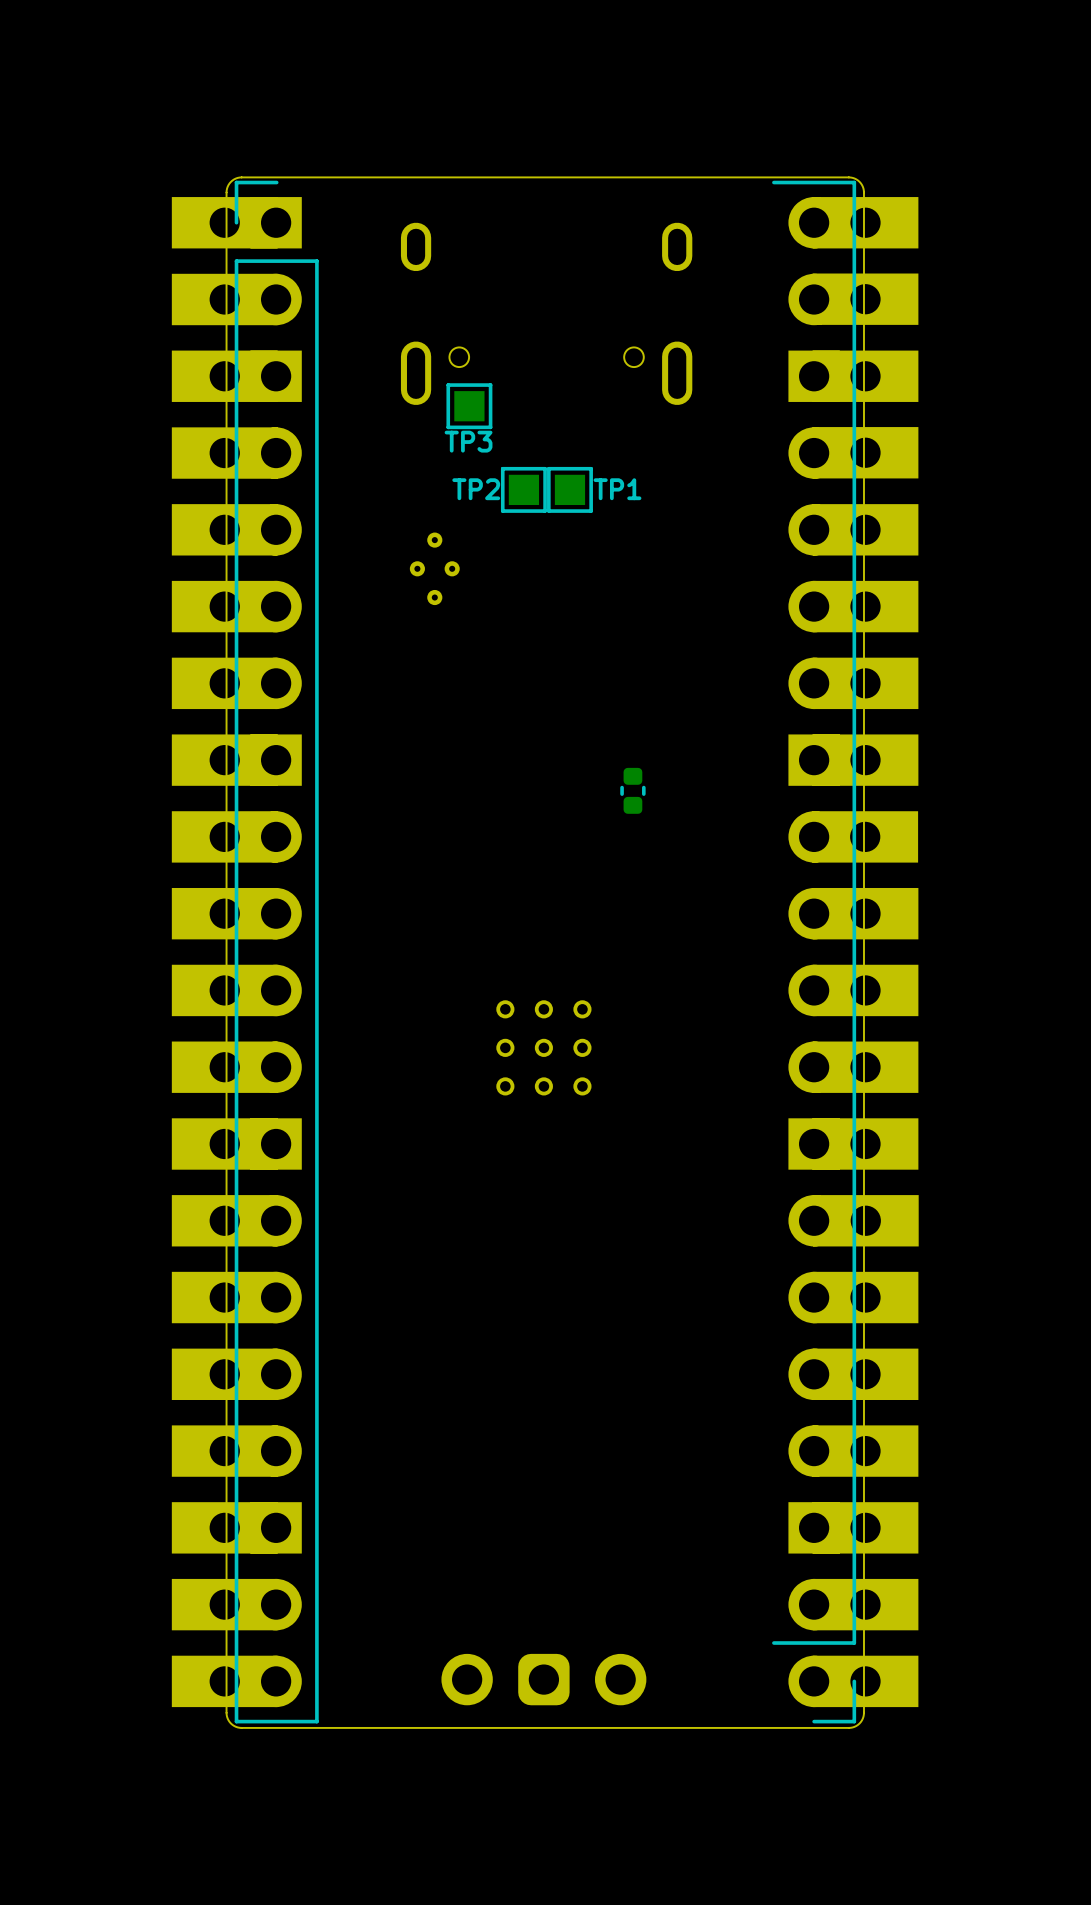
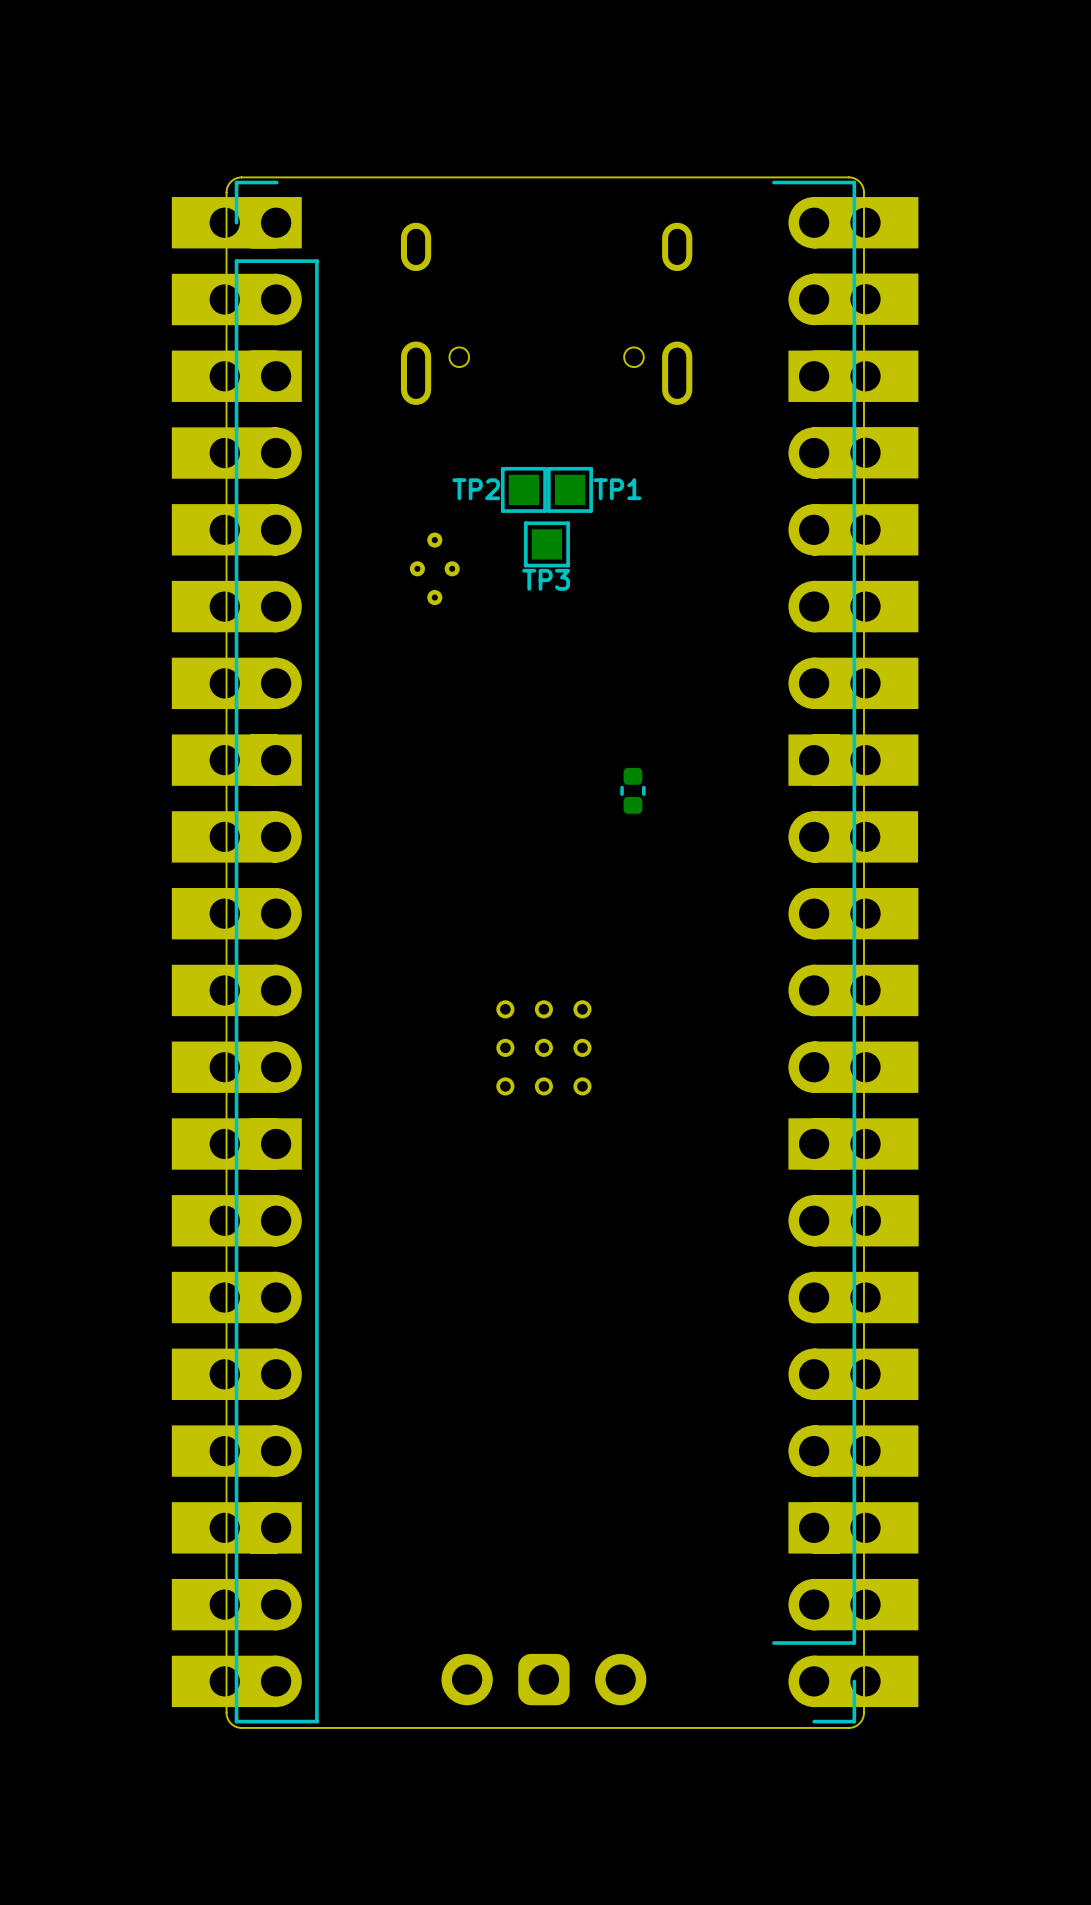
TP3 position: (469, 406) -> (546, 544)

